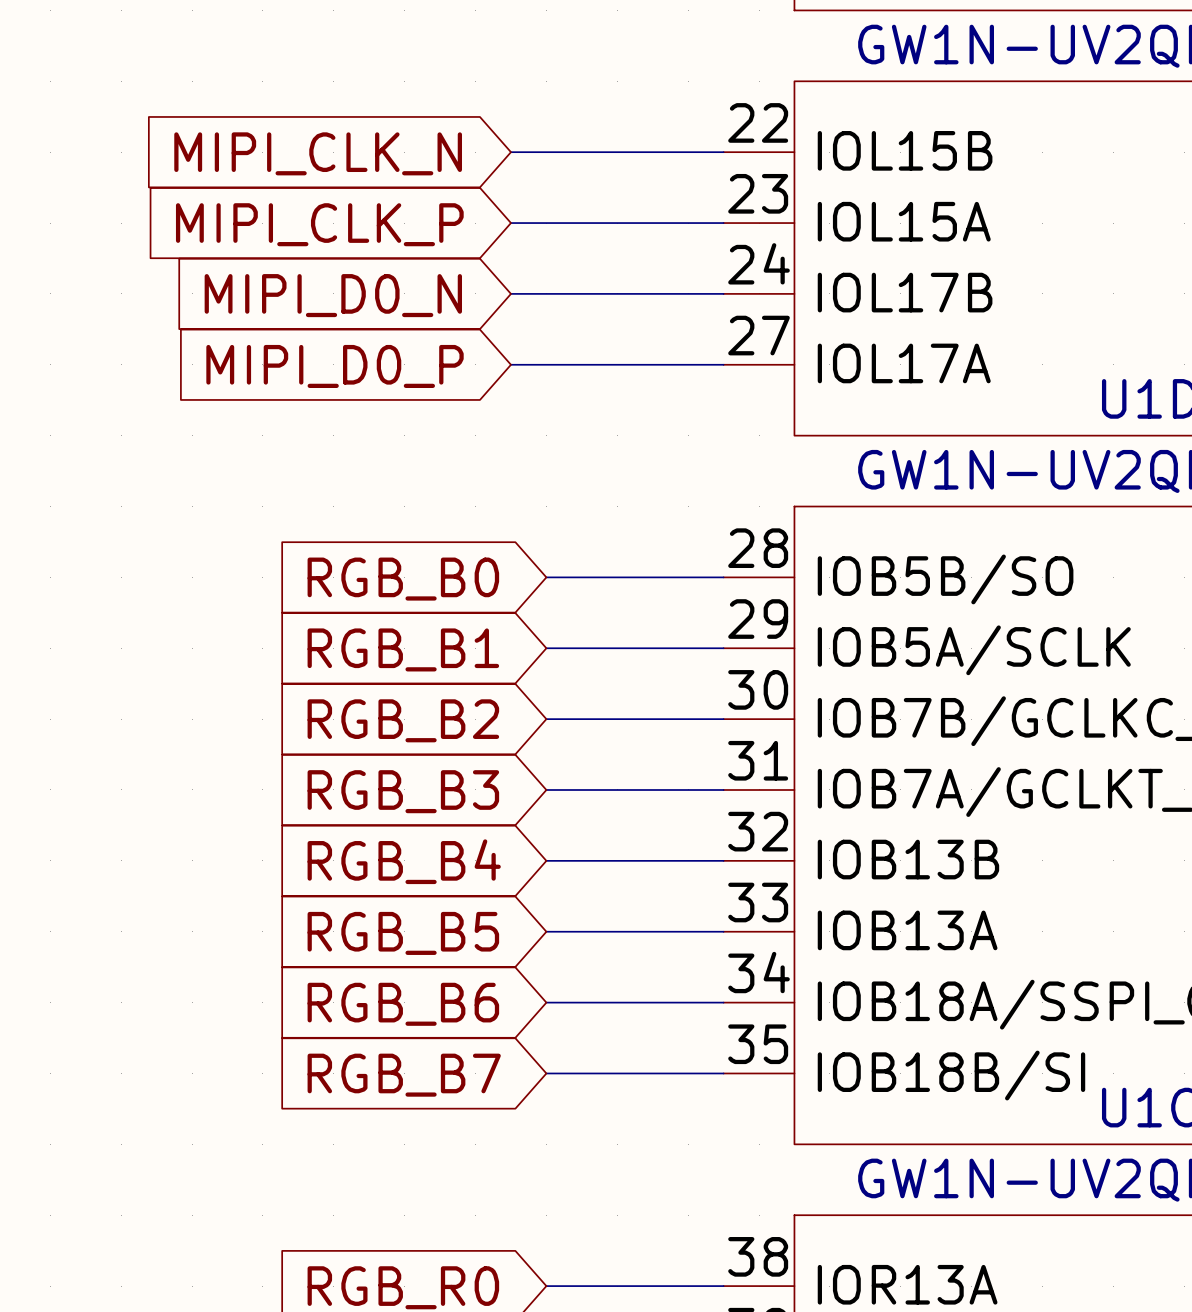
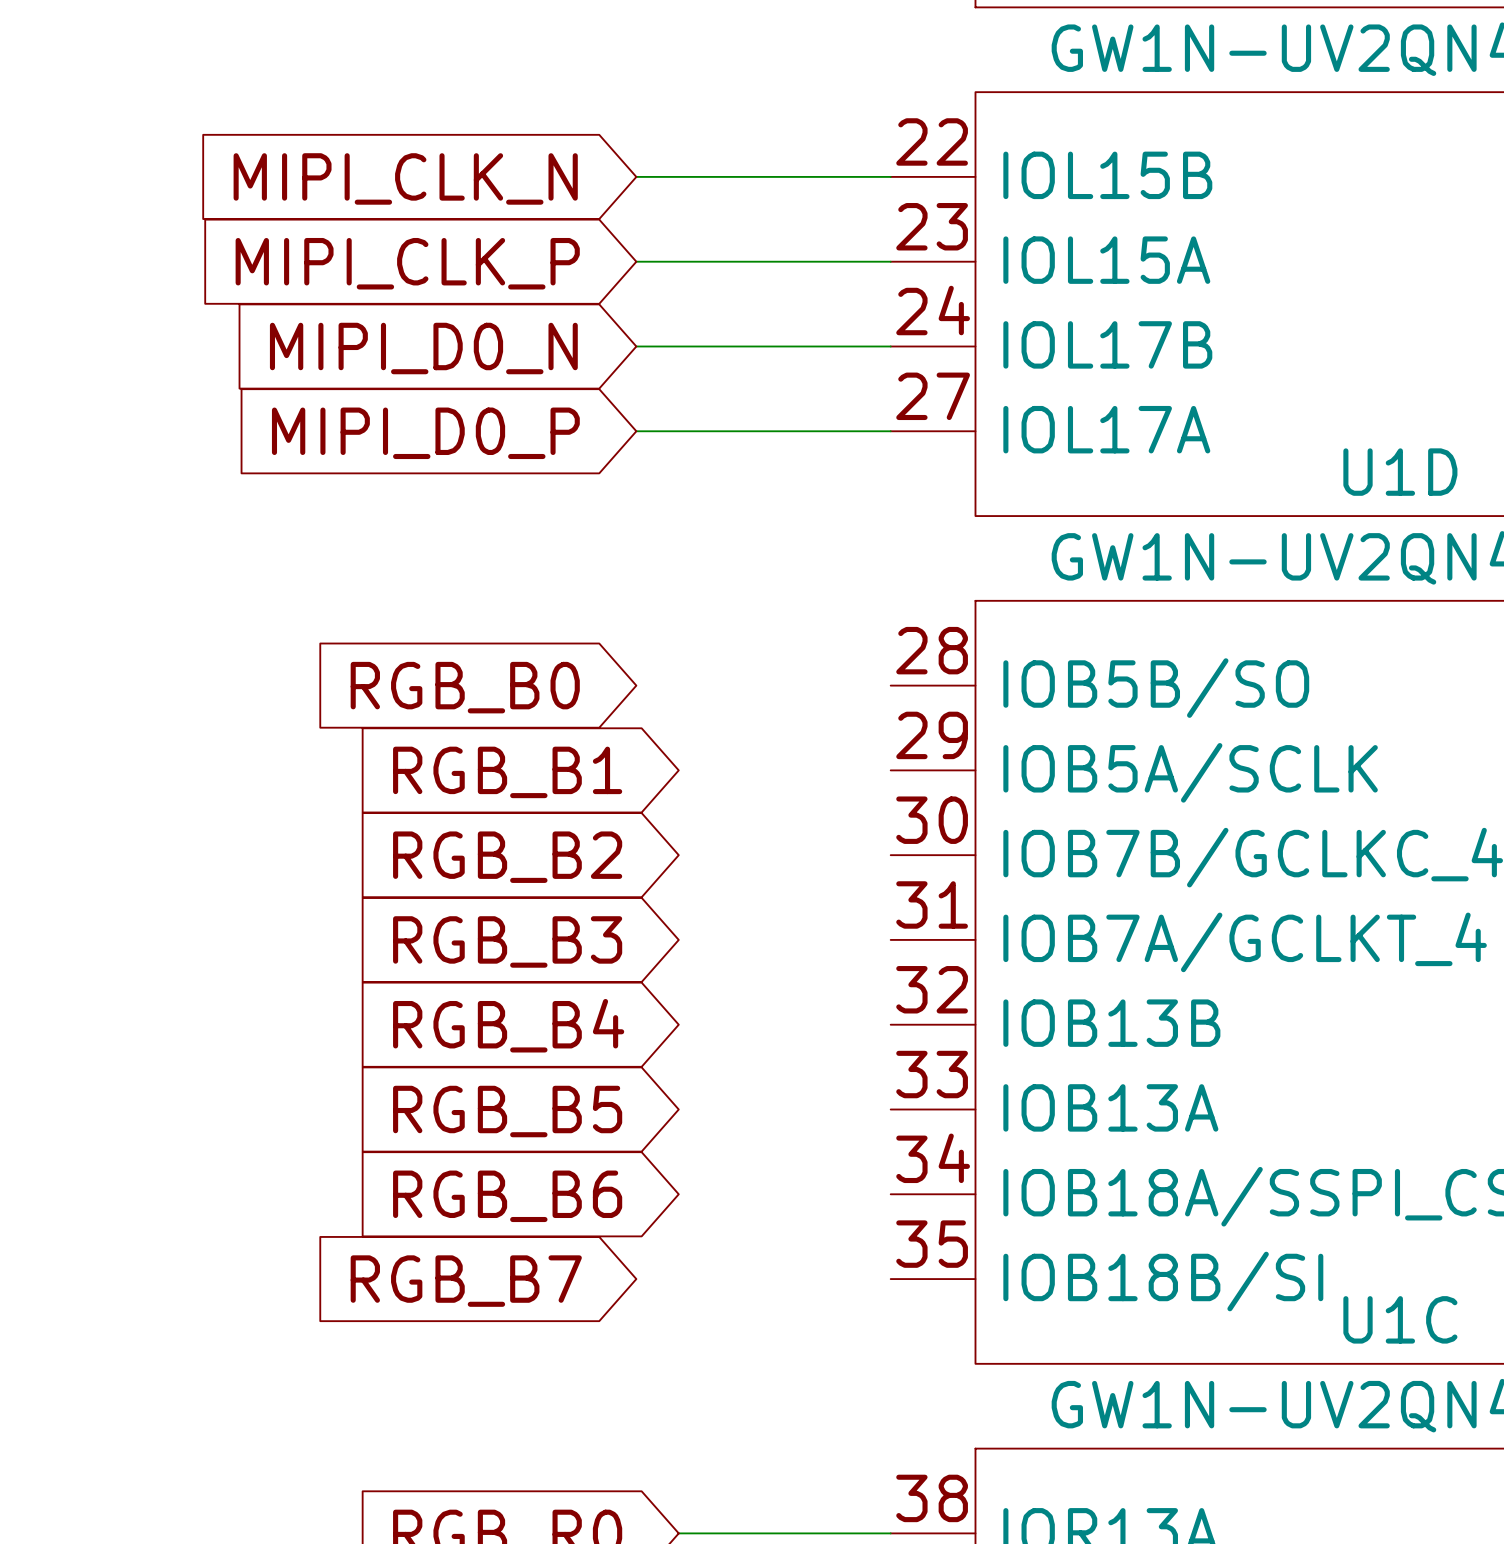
wire: (546, 577) (723, 577) -> none
global label position: RGB_B0 (403, 579) -> RGB_B0 (465, 687)
wire: (546, 648) (723, 648) -> none
wire: (546, 719) (723, 719) -> none
wire: (546, 789) (723, 789) -> none
wire: (546, 860) (723, 860) -> none
wire: (546, 931) (723, 931) -> none
wire: (546, 1002) (723, 1002) -> none
wire: (546, 1073) (723, 1073) -> none
global label position: RGB_B7 (404, 1075) -> RGB_B7 (466, 1281)

